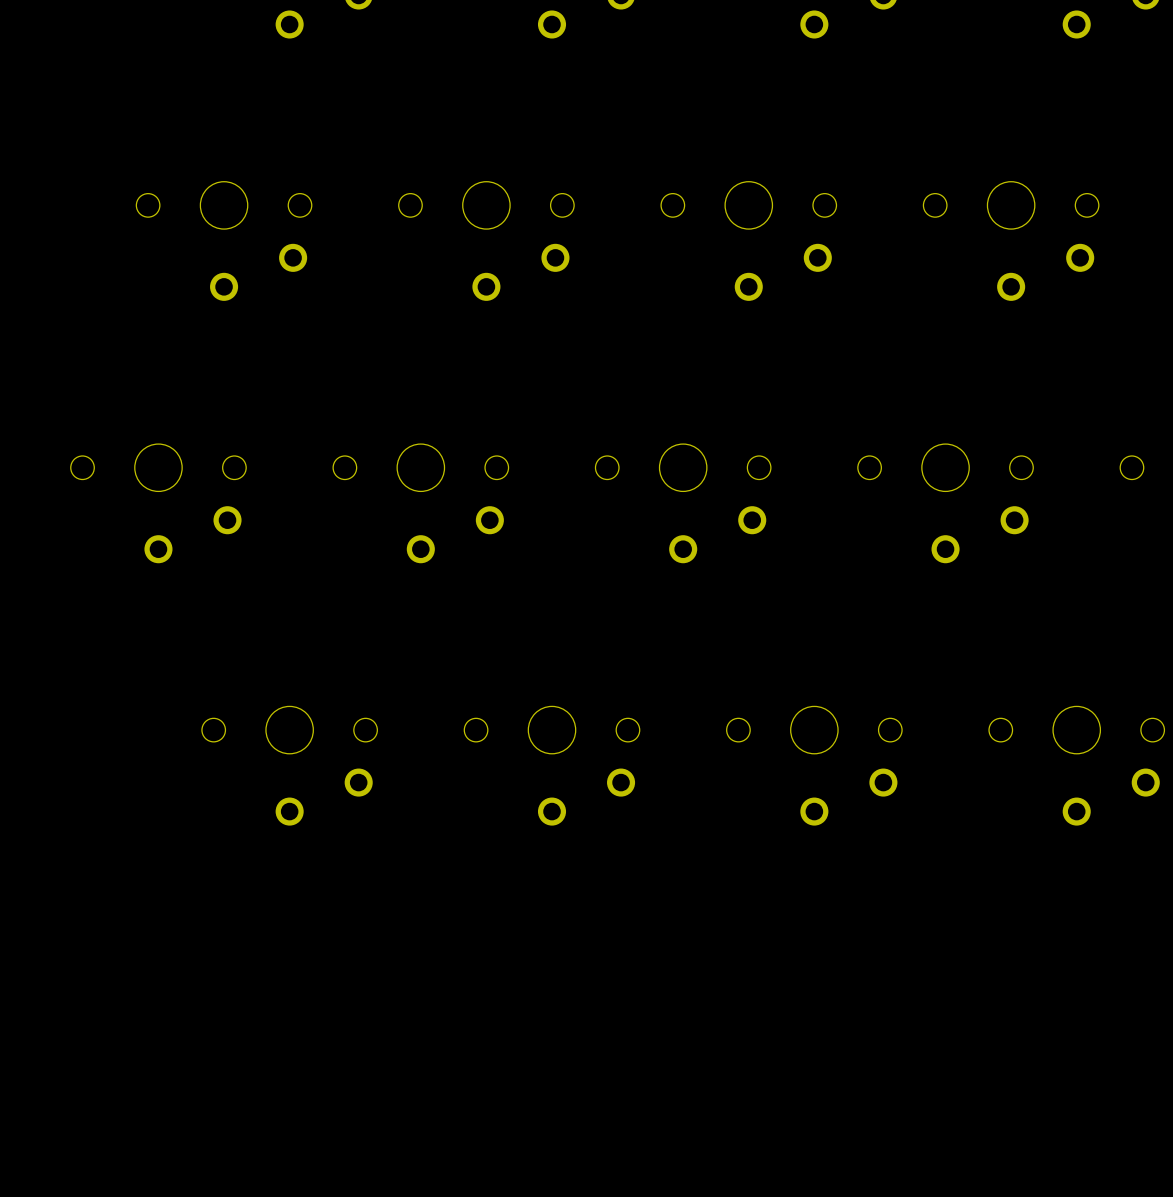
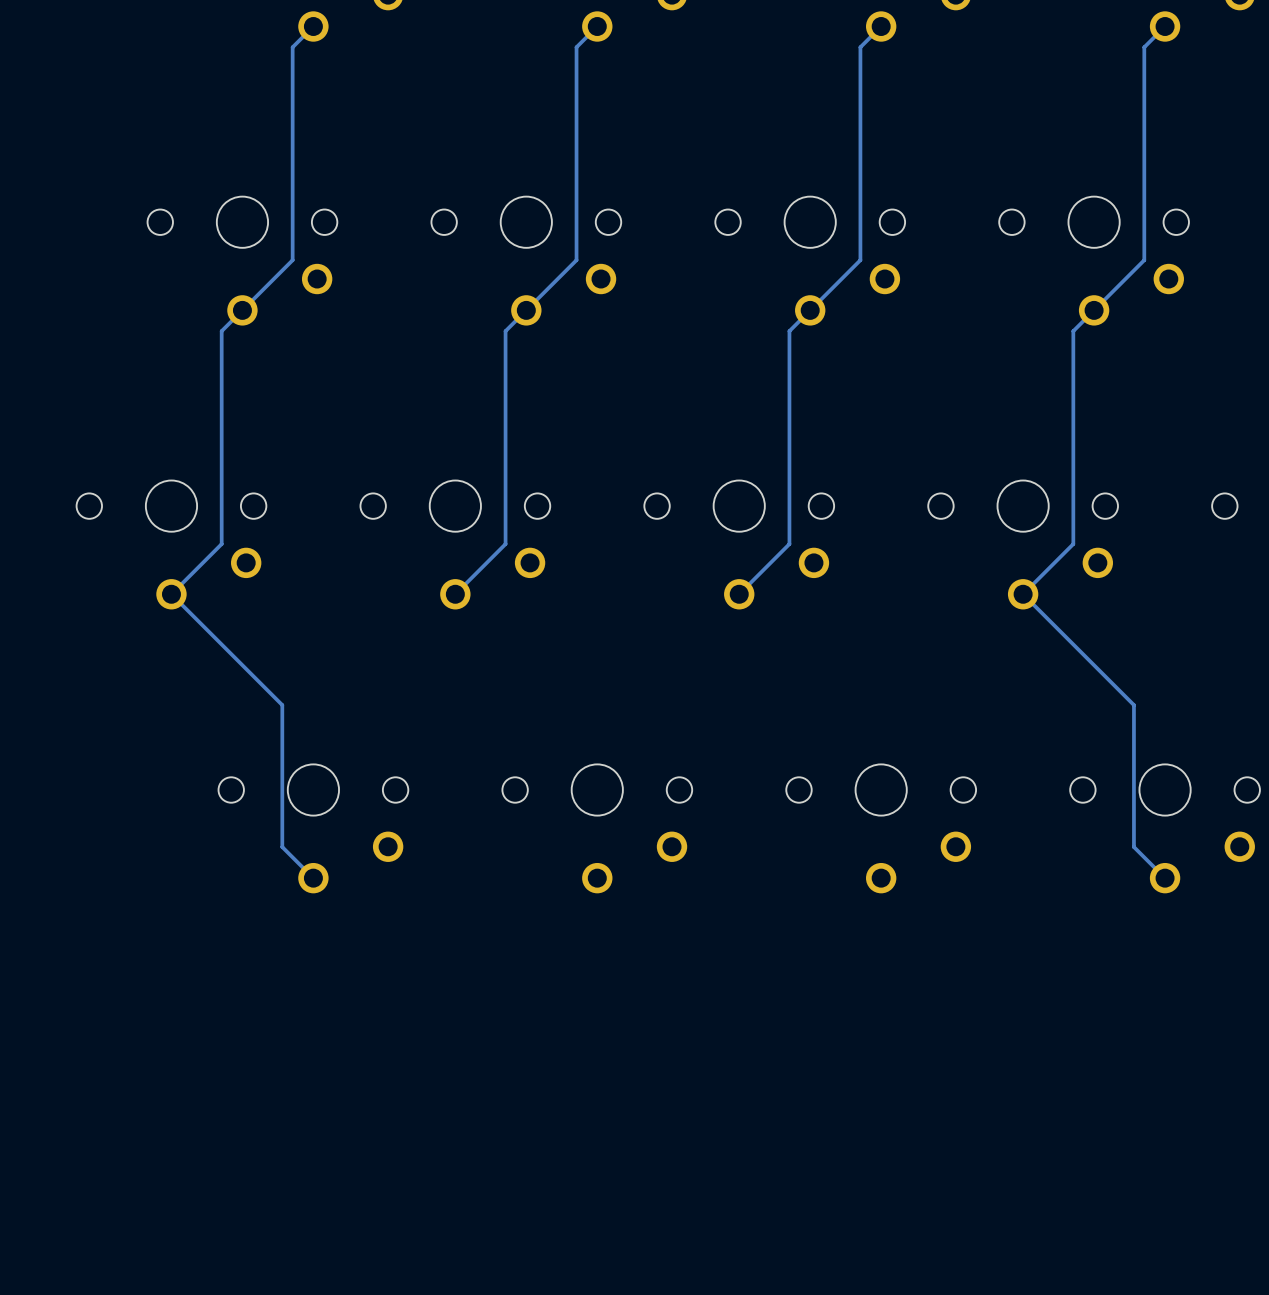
track: none -> (313, 26) (292, 47) (292, 260) (221, 331) (221, 544) (171, 594) (282, 705) (282, 847) (313, 878)
track: none -> (597, 26) (576, 47) (576, 260) (505, 331) (505, 544) (455, 594)
track: none -> (881, 26) (860, 47) (860, 260) (789, 331) (789, 544) (739, 594)
track: none -> (1165, 26) (1144, 47) (1144, 260) (1073, 331) (1073, 544) (1023, 594) (1133, 705) (1133, 847) (1165, 878)

